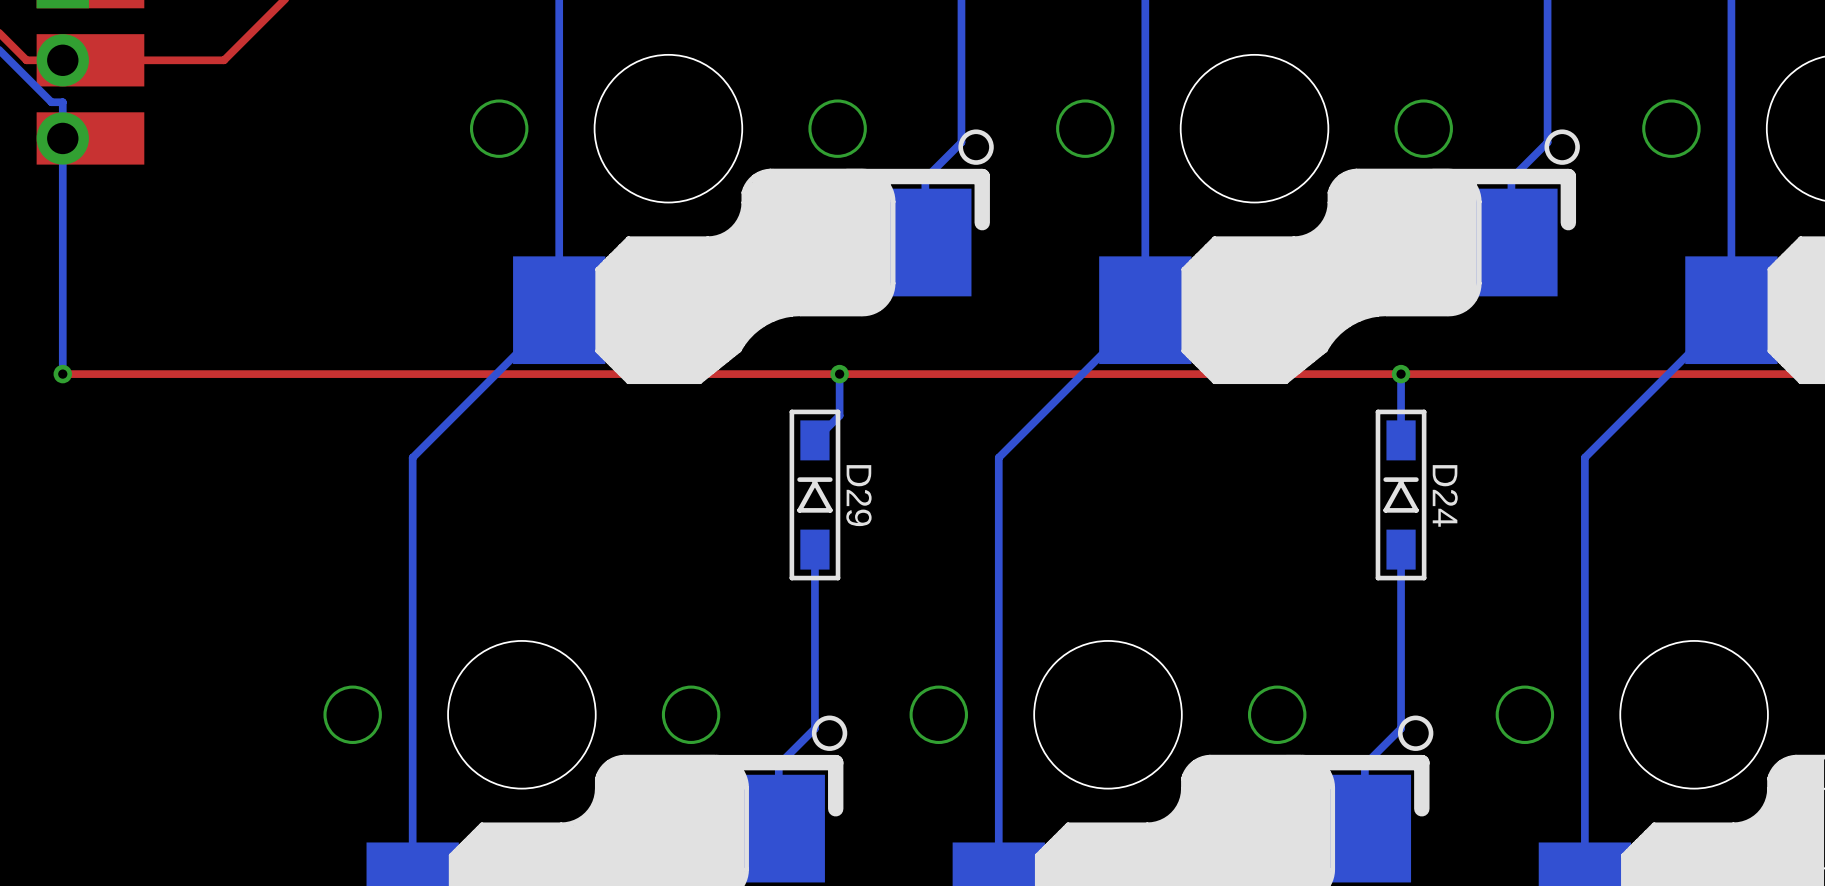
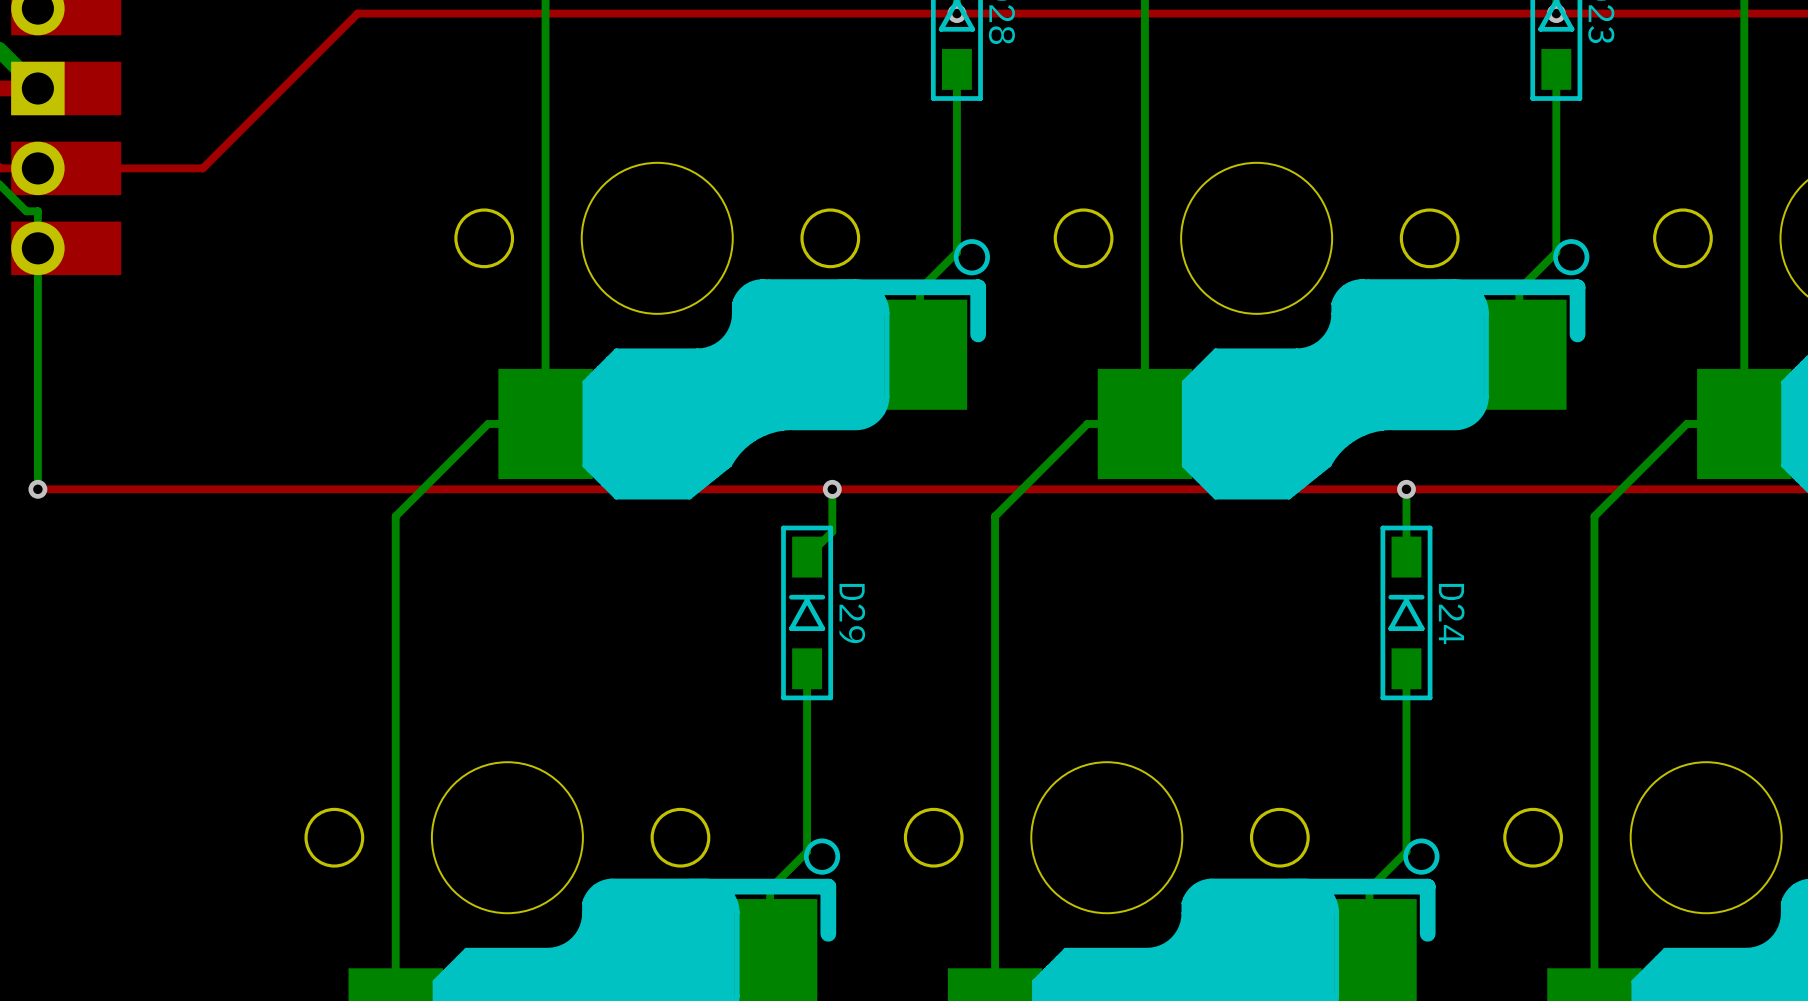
bottom track: (559, 310) (412, 457) -> (545, 423) (488, 423) (395, 516) (395, 574)
bottom track: (1145, 310) (998, 457) -> (1144, 423) (1087, 423) (995, 516) (995, 574)
bottom track: (1731, 310) (1584, 457) -> (1744, 423) (1686, 423) (1594, 516) (1594, 574)

